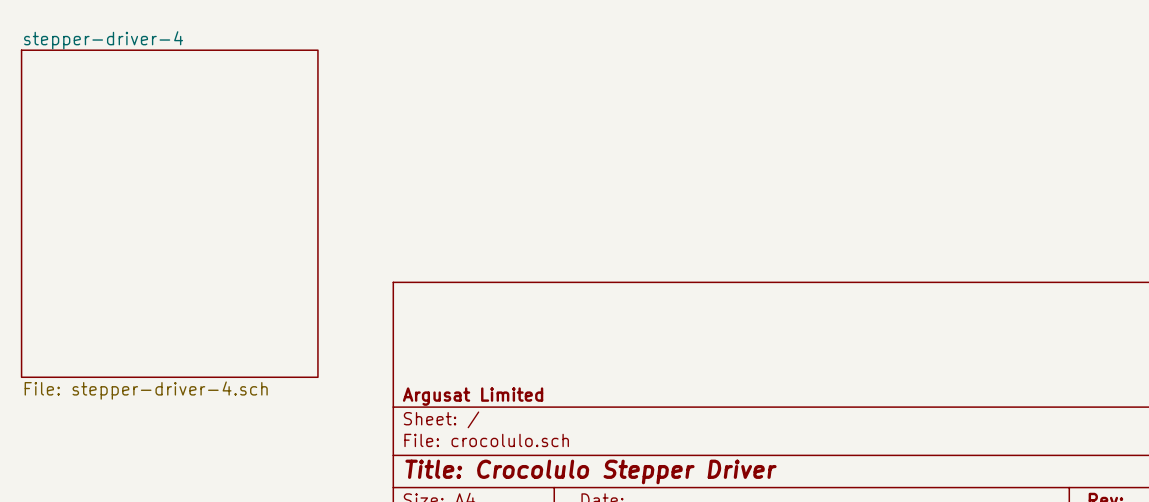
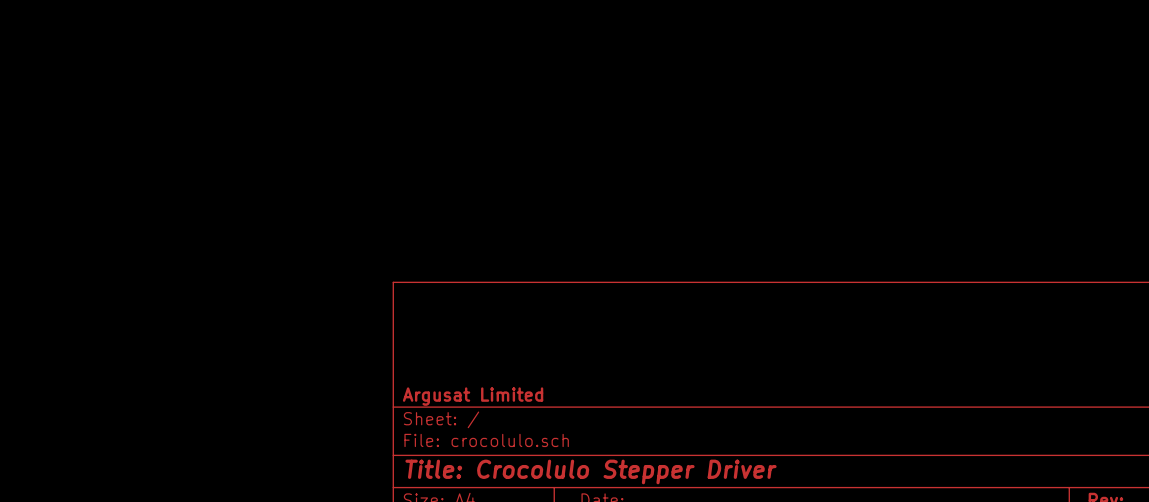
sheet stepper-driver-4: File: stepper-driver-4.sch (169, 213) -> none

